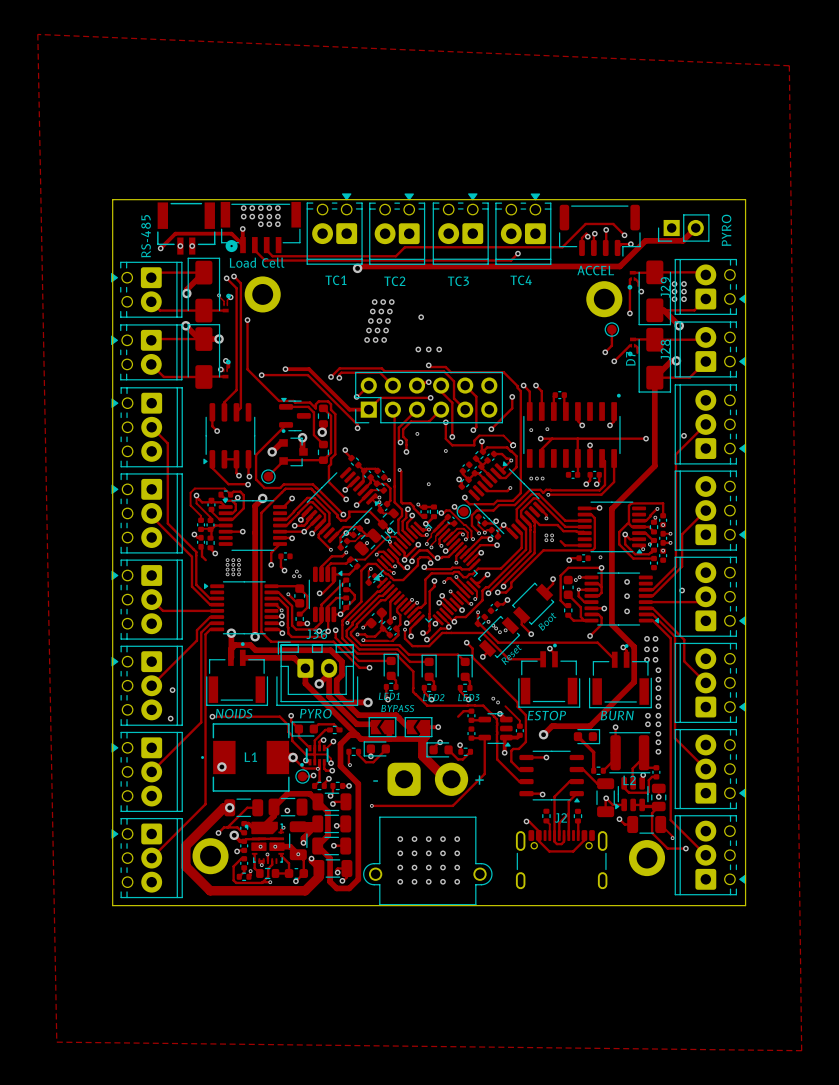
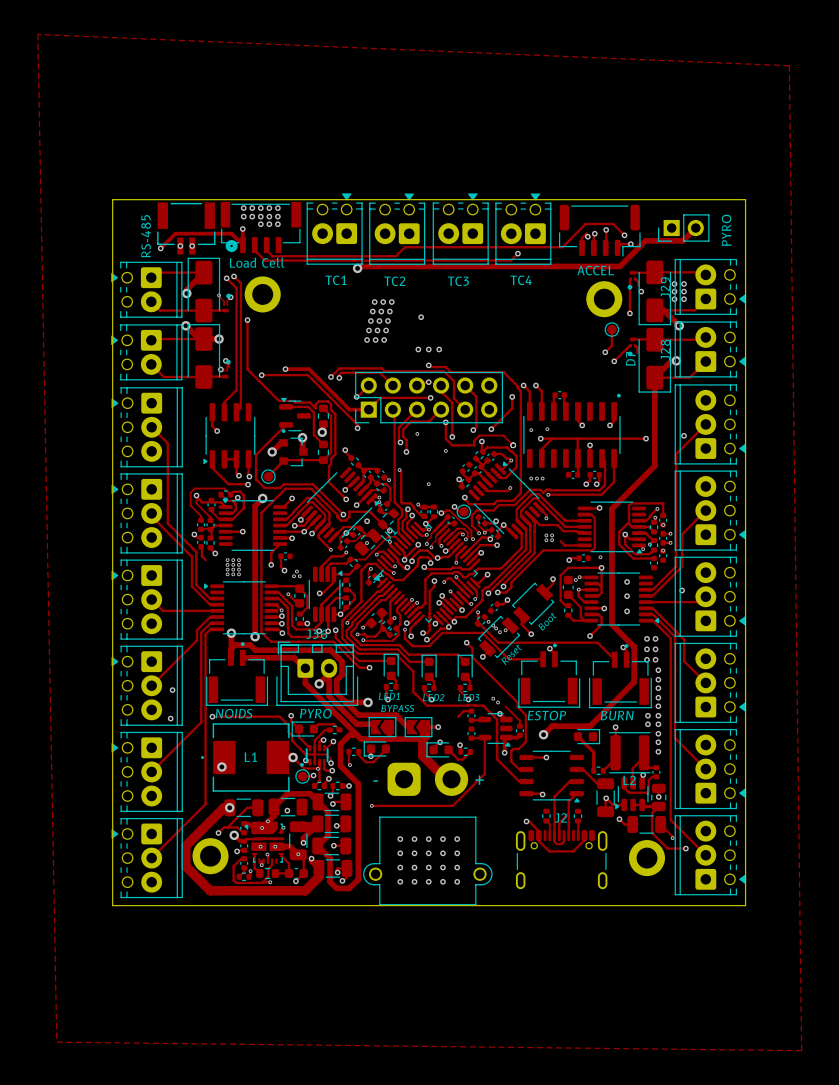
via: none -> (267, 821)
via: none -> (262, 827)

